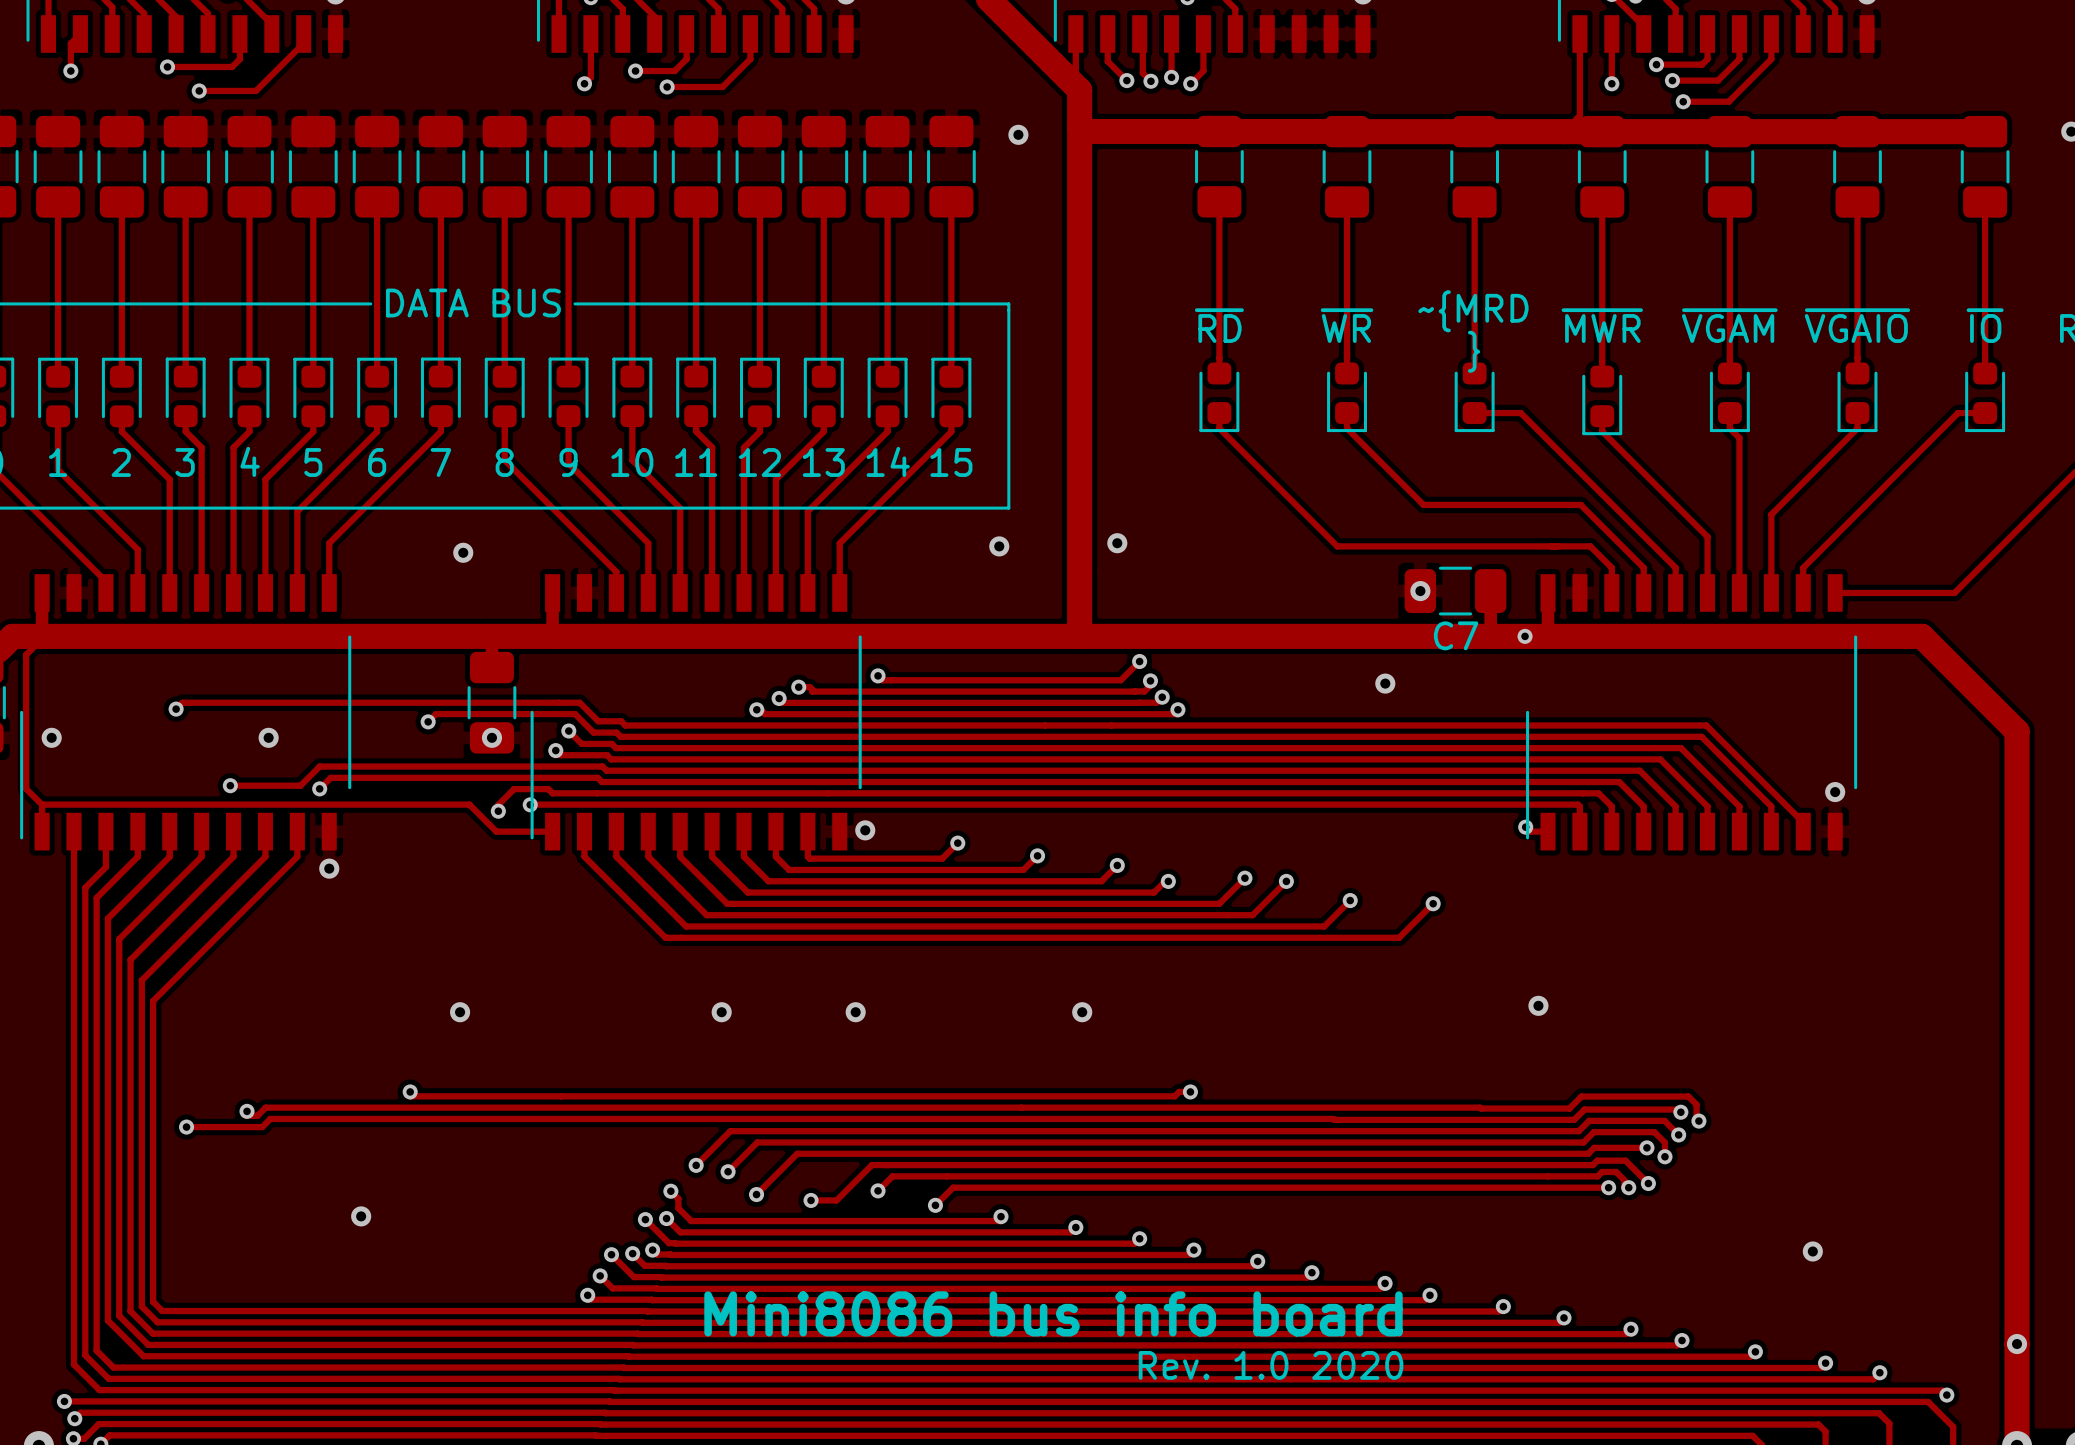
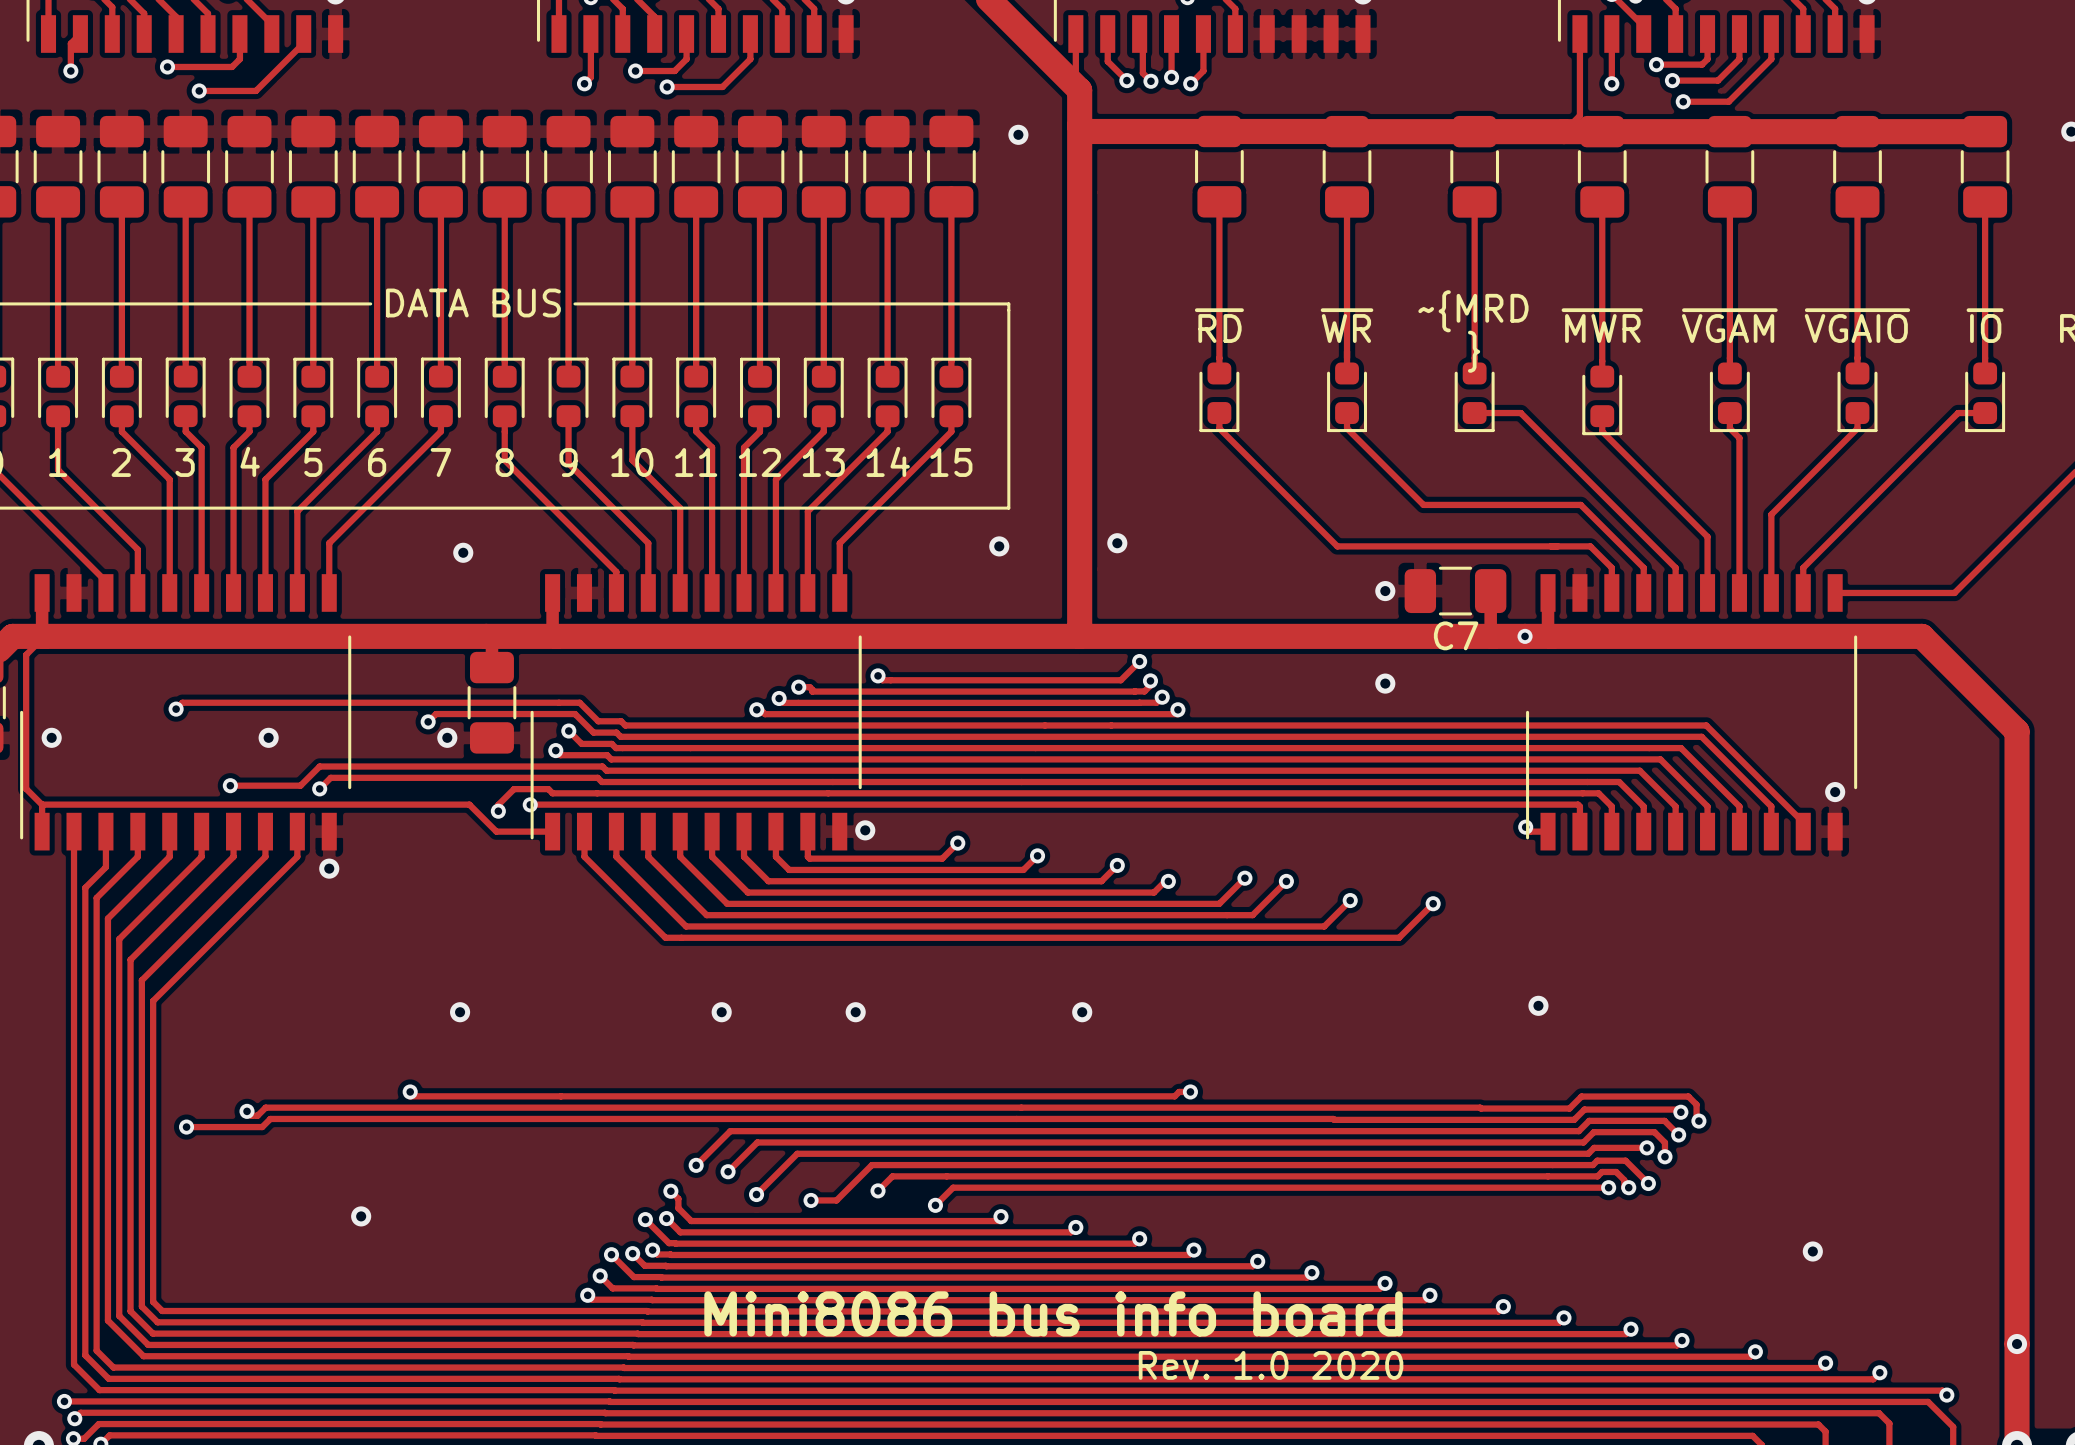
via position: (1420, 591) -> (1385, 591)
via position: (491, 737) -> (447, 737)

